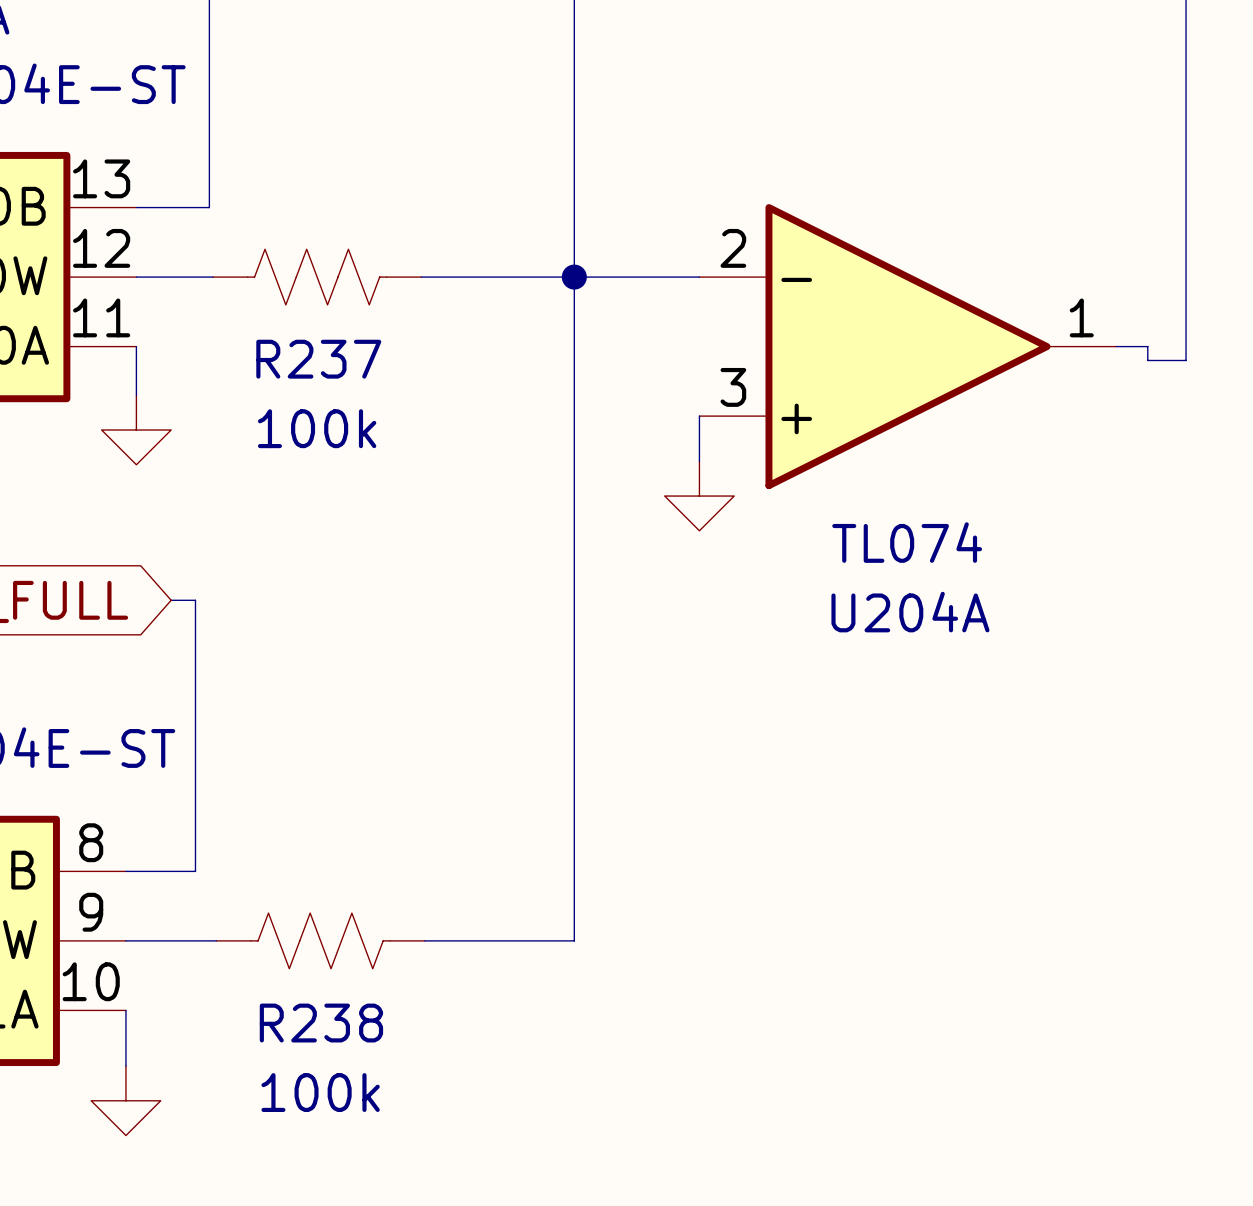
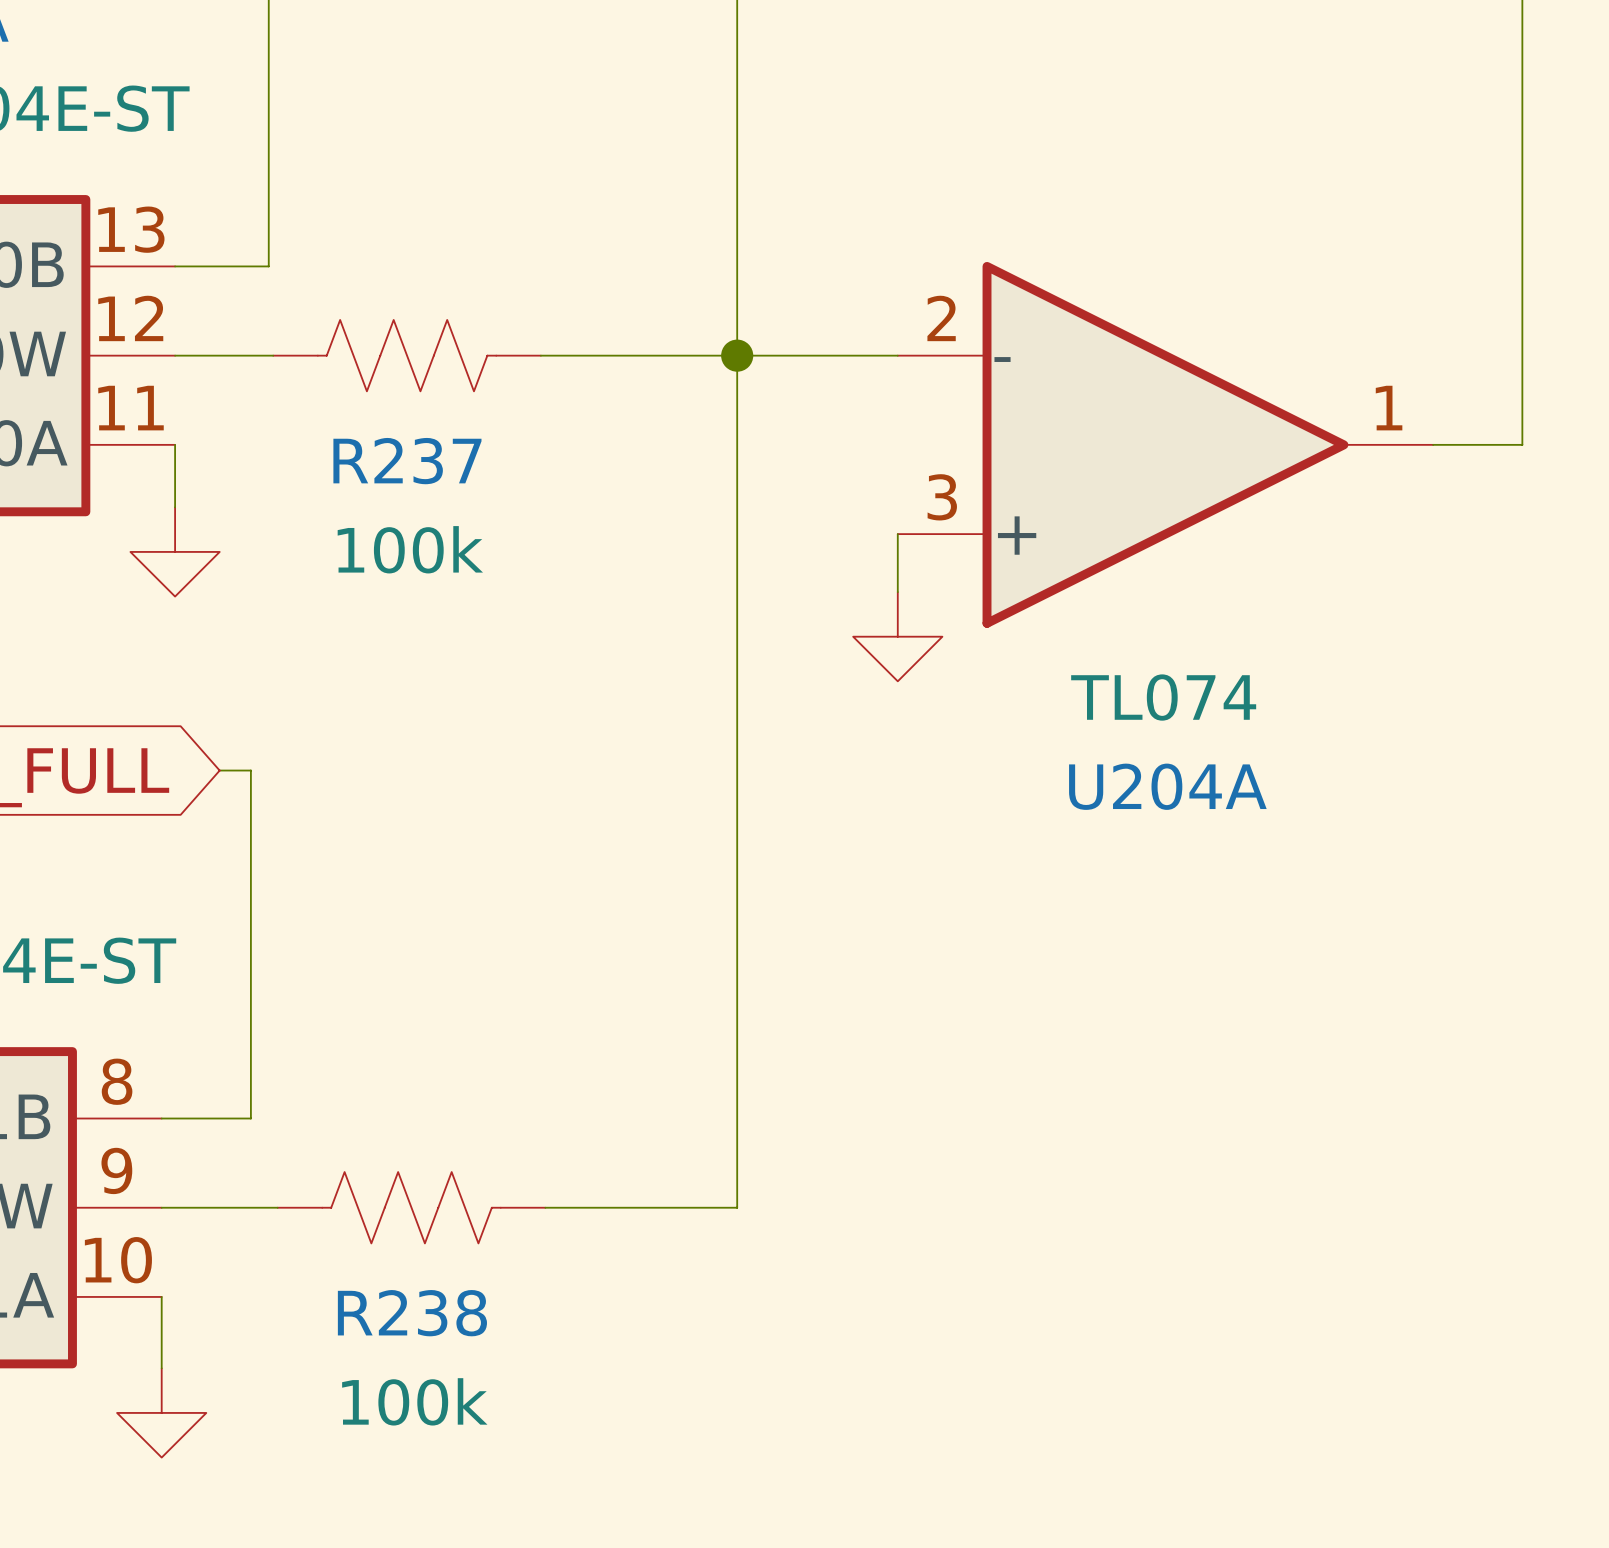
wire: (1147, 346) (1147, 360) (1186, 360) (1186, 346) -> (1473, 444) (1522, 444)

